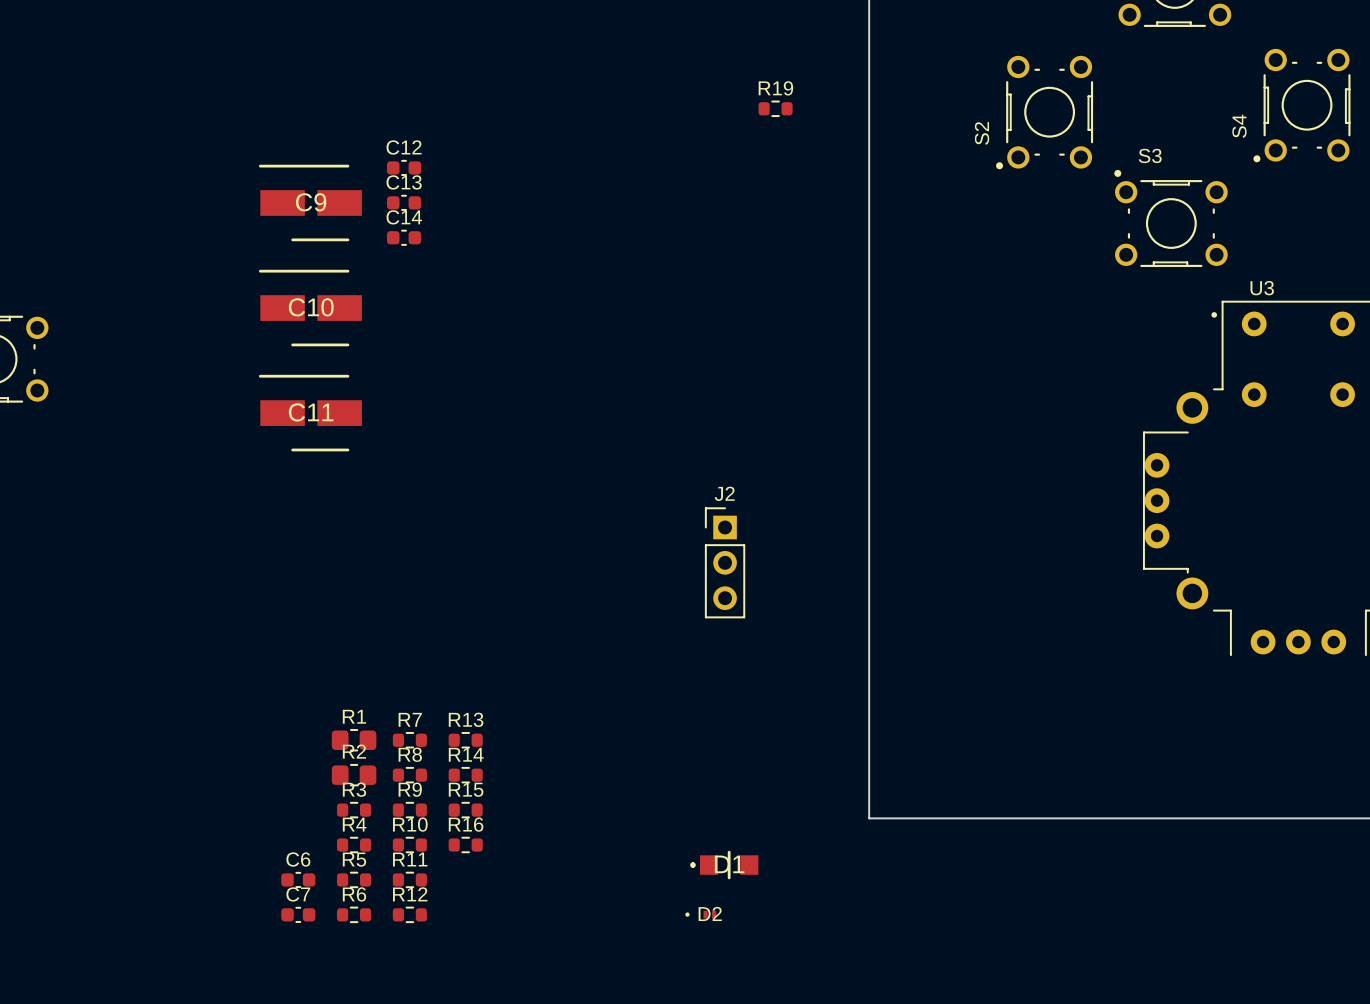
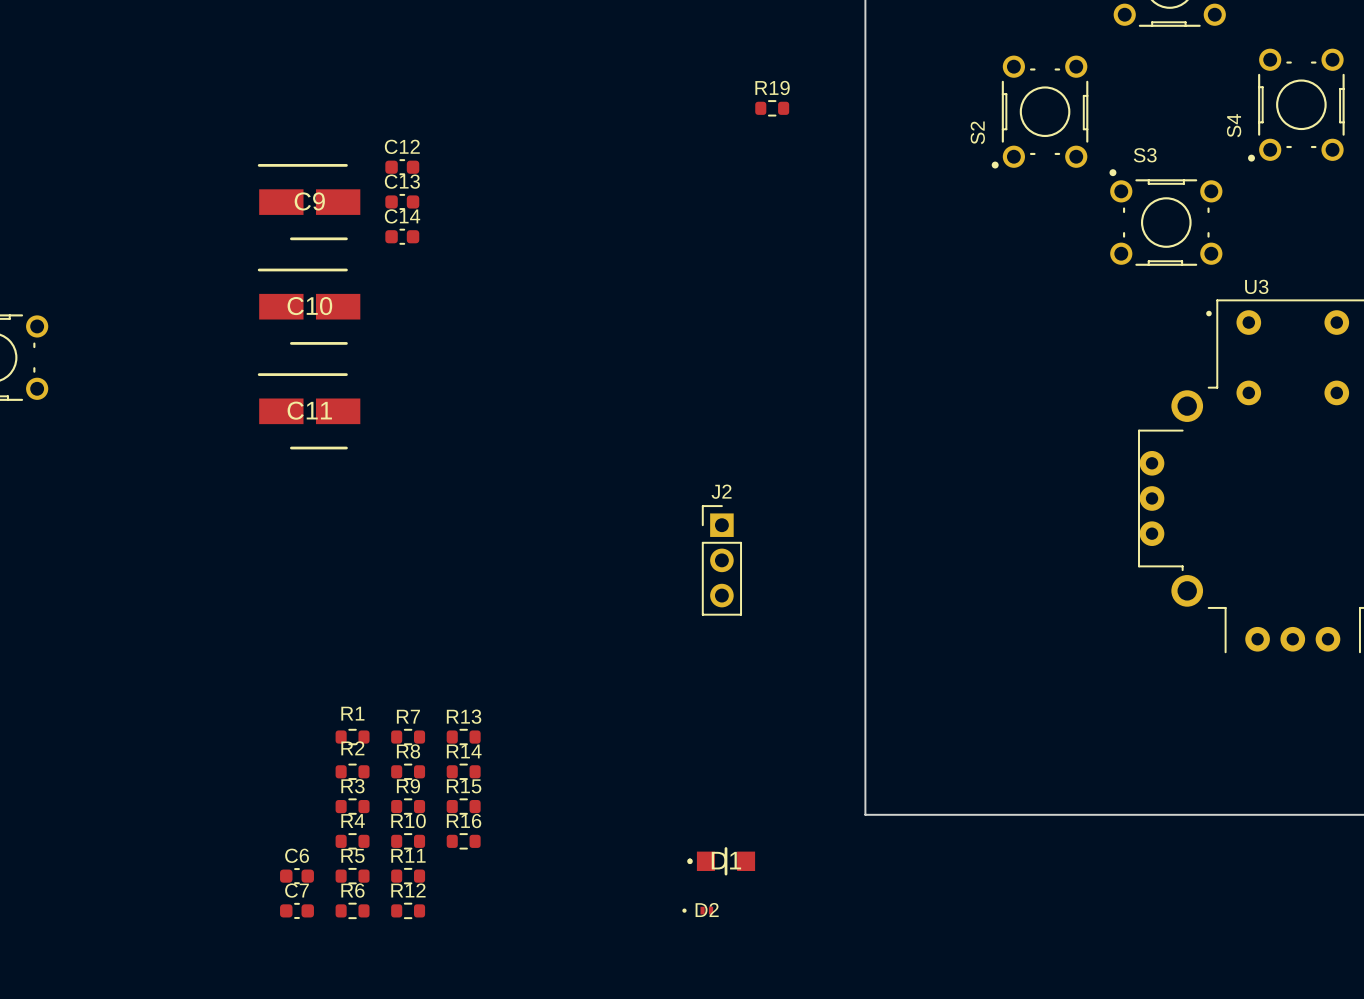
R1 footprint: [331, 729, 377, 752] -> [335, 728, 370, 746]
R2 footprint: [331, 764, 377, 787] -> [335, 763, 370, 780]

